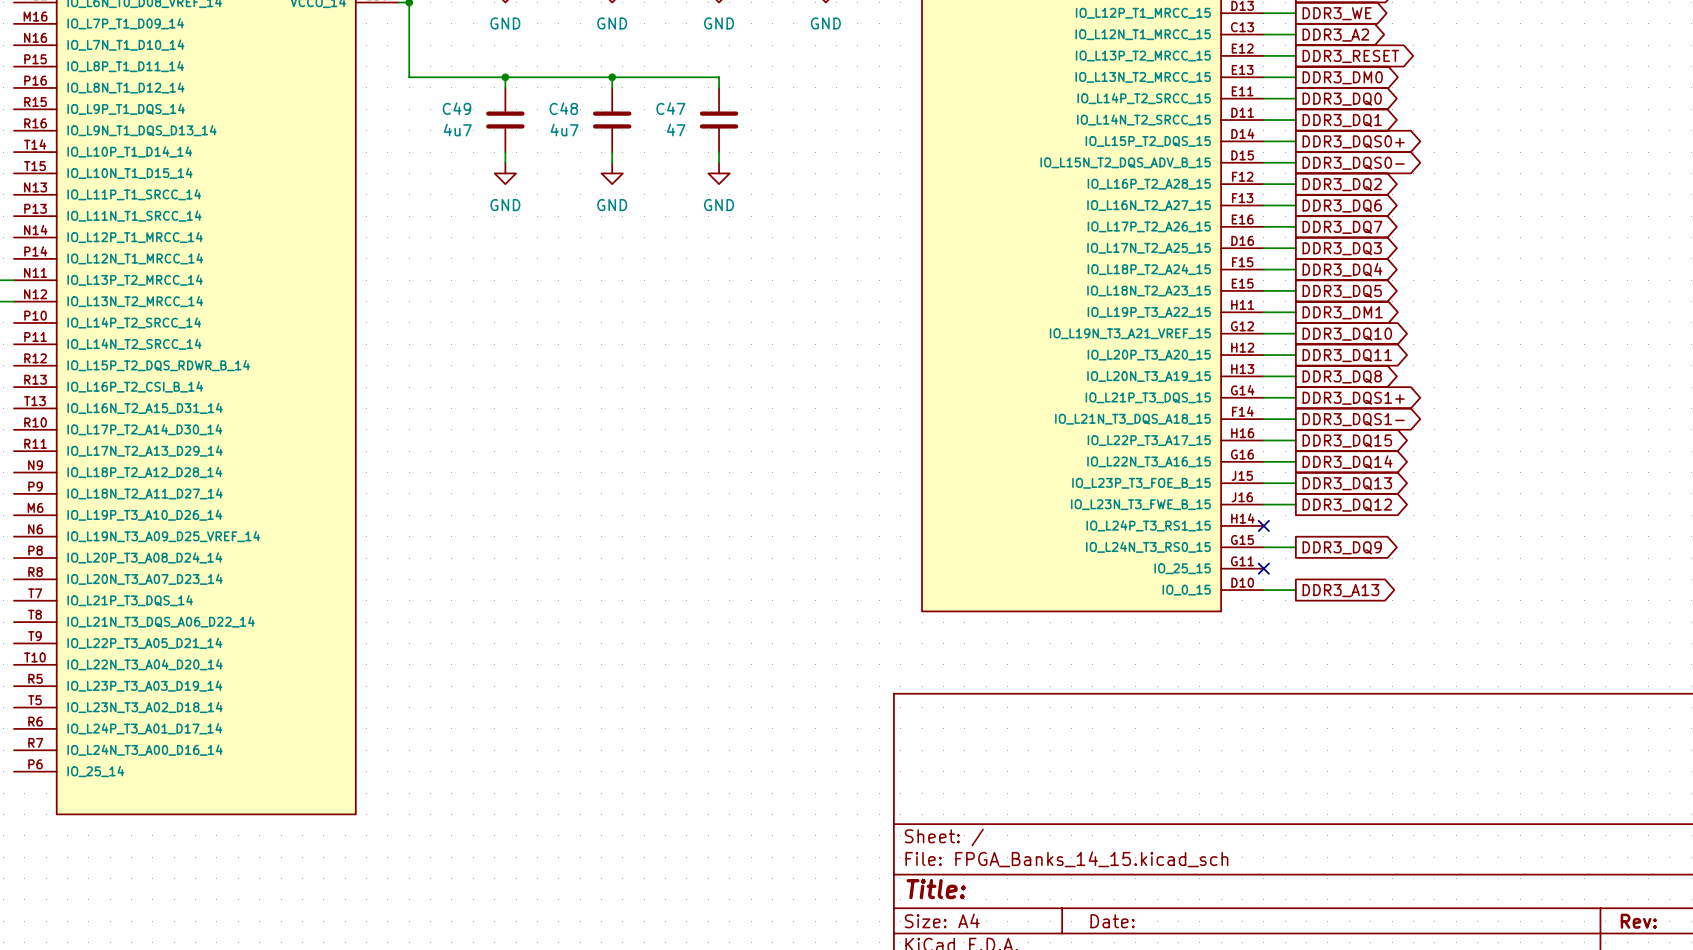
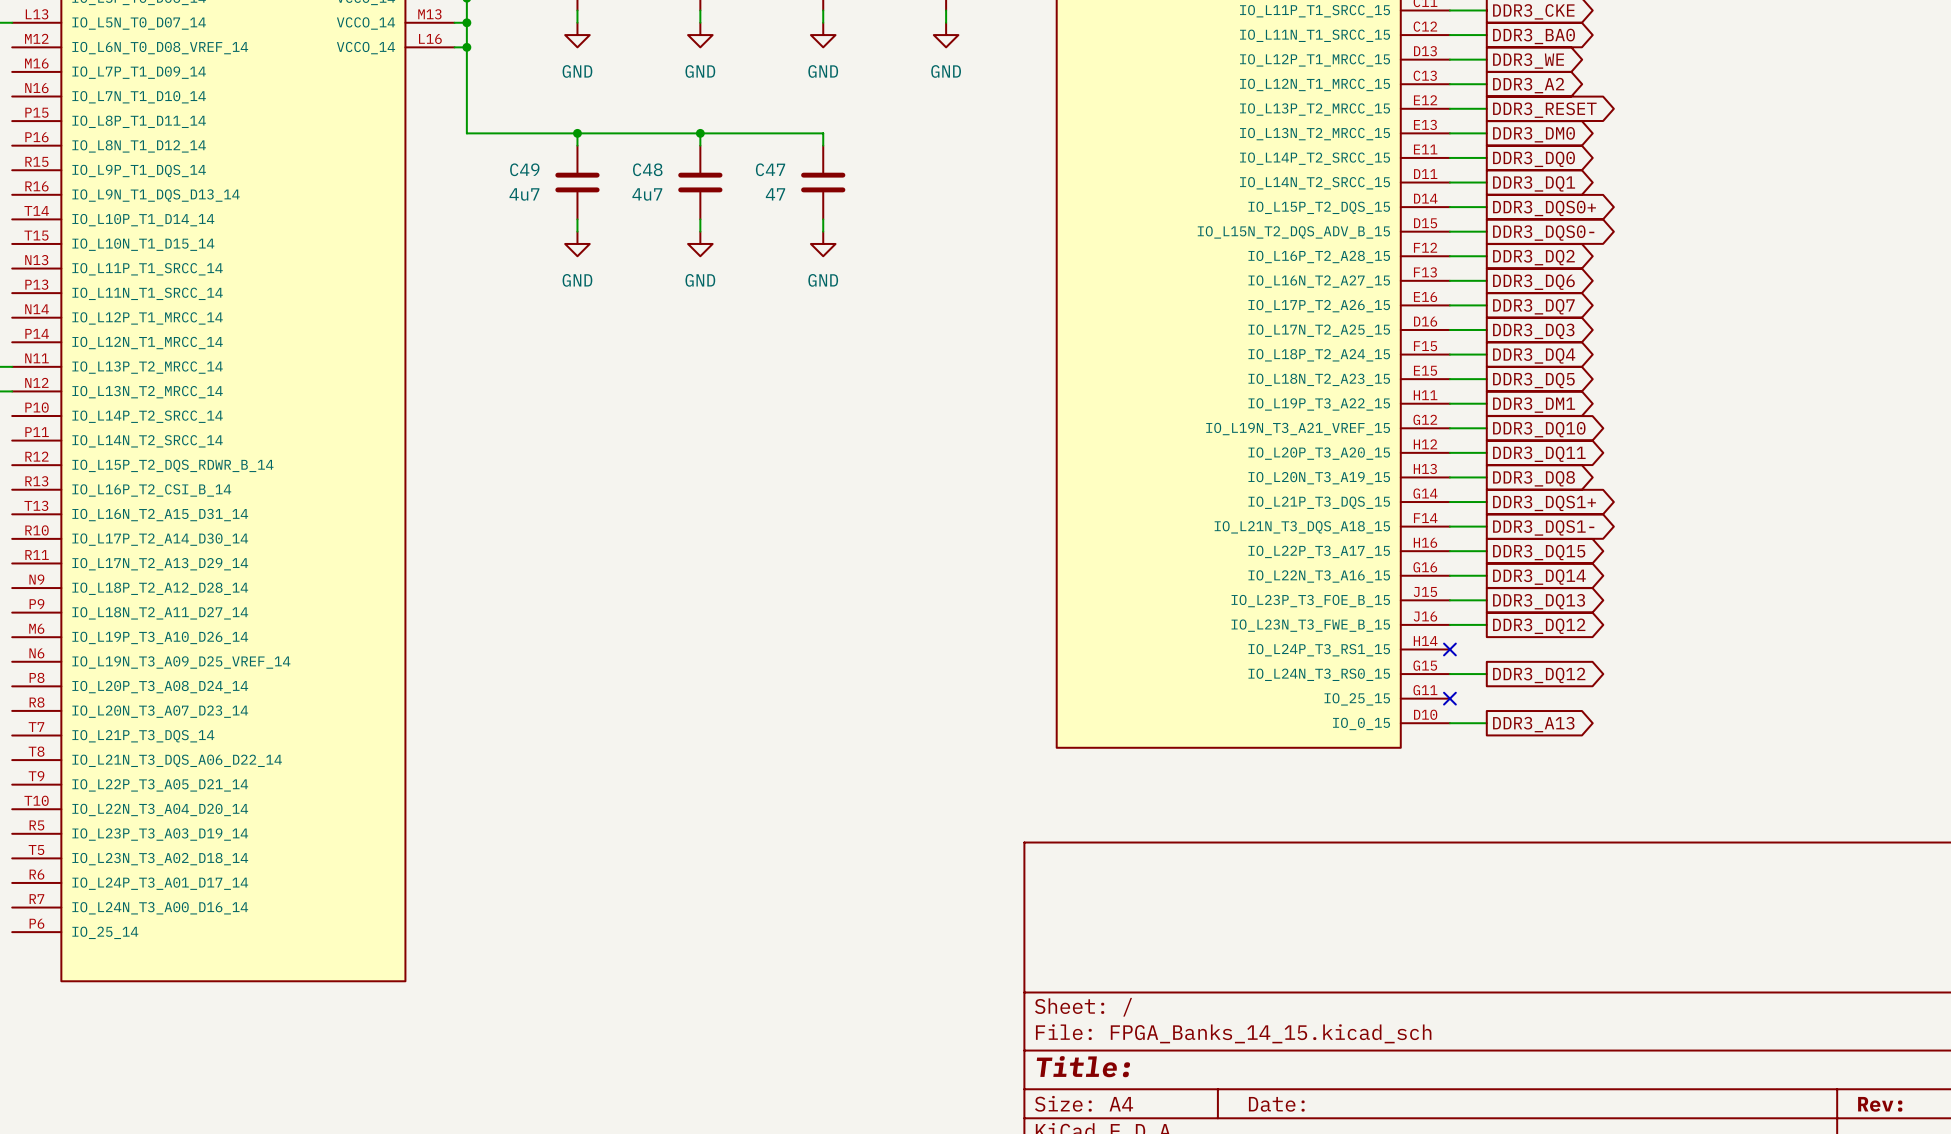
global label: DDR3_DQ9 (1342, 547) -> DDR3_DQ12 (1539, 675)

